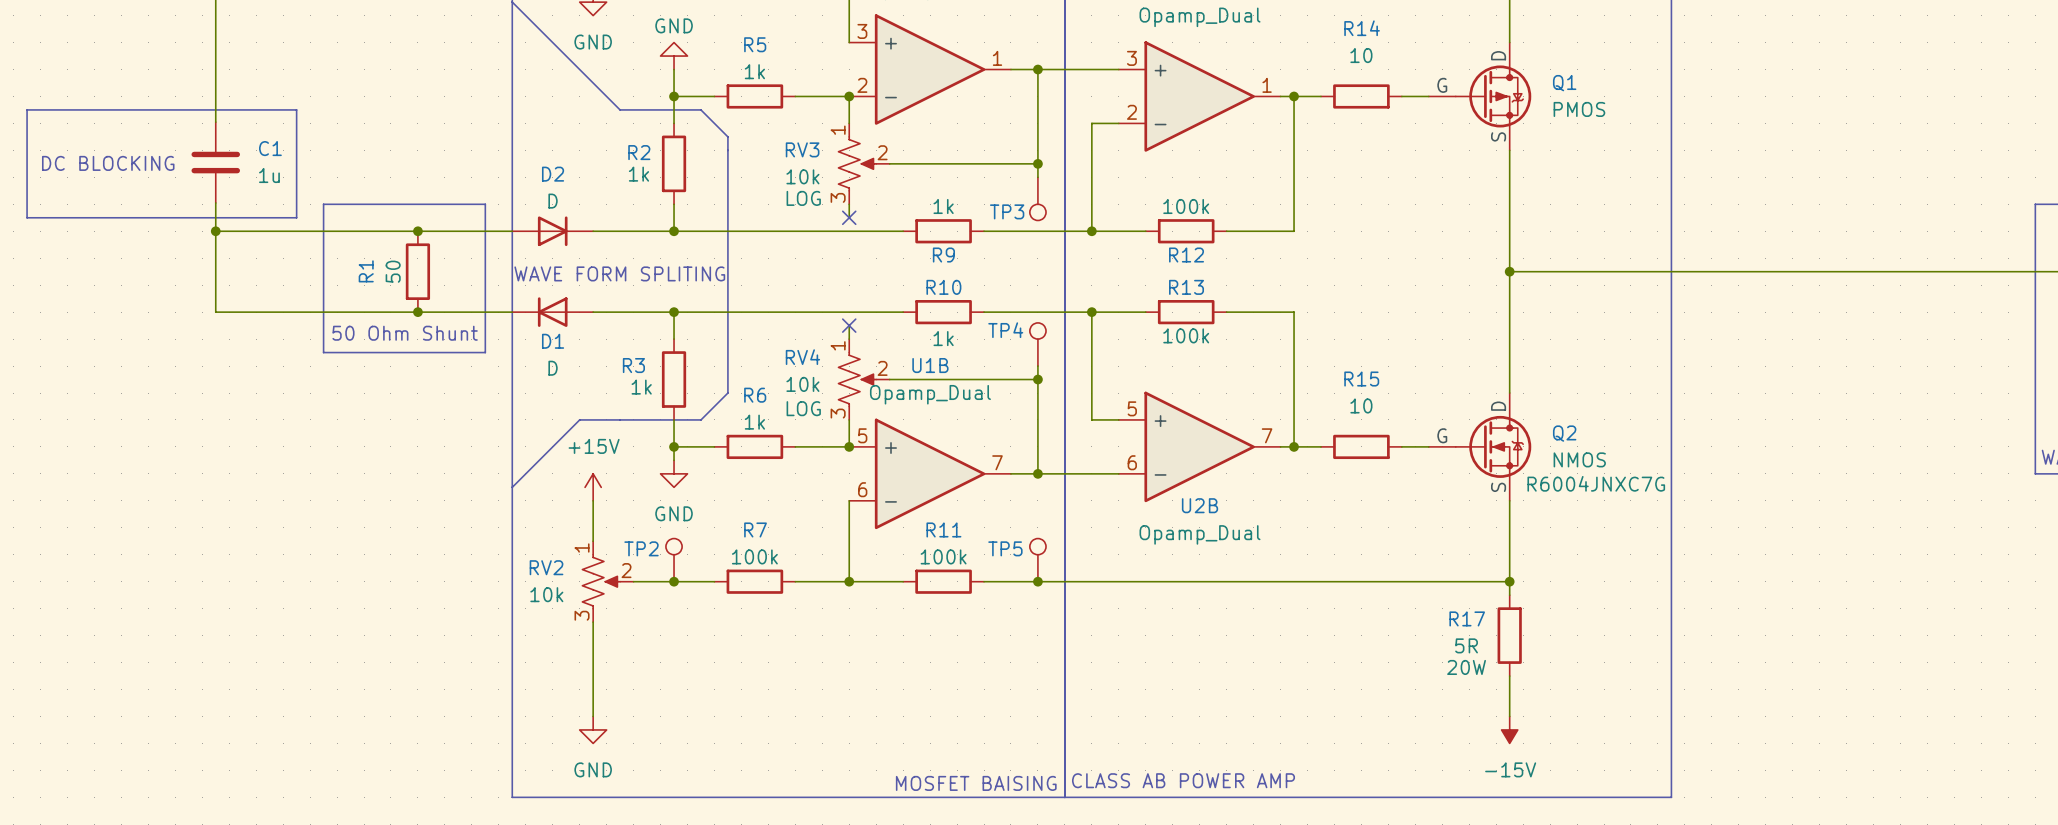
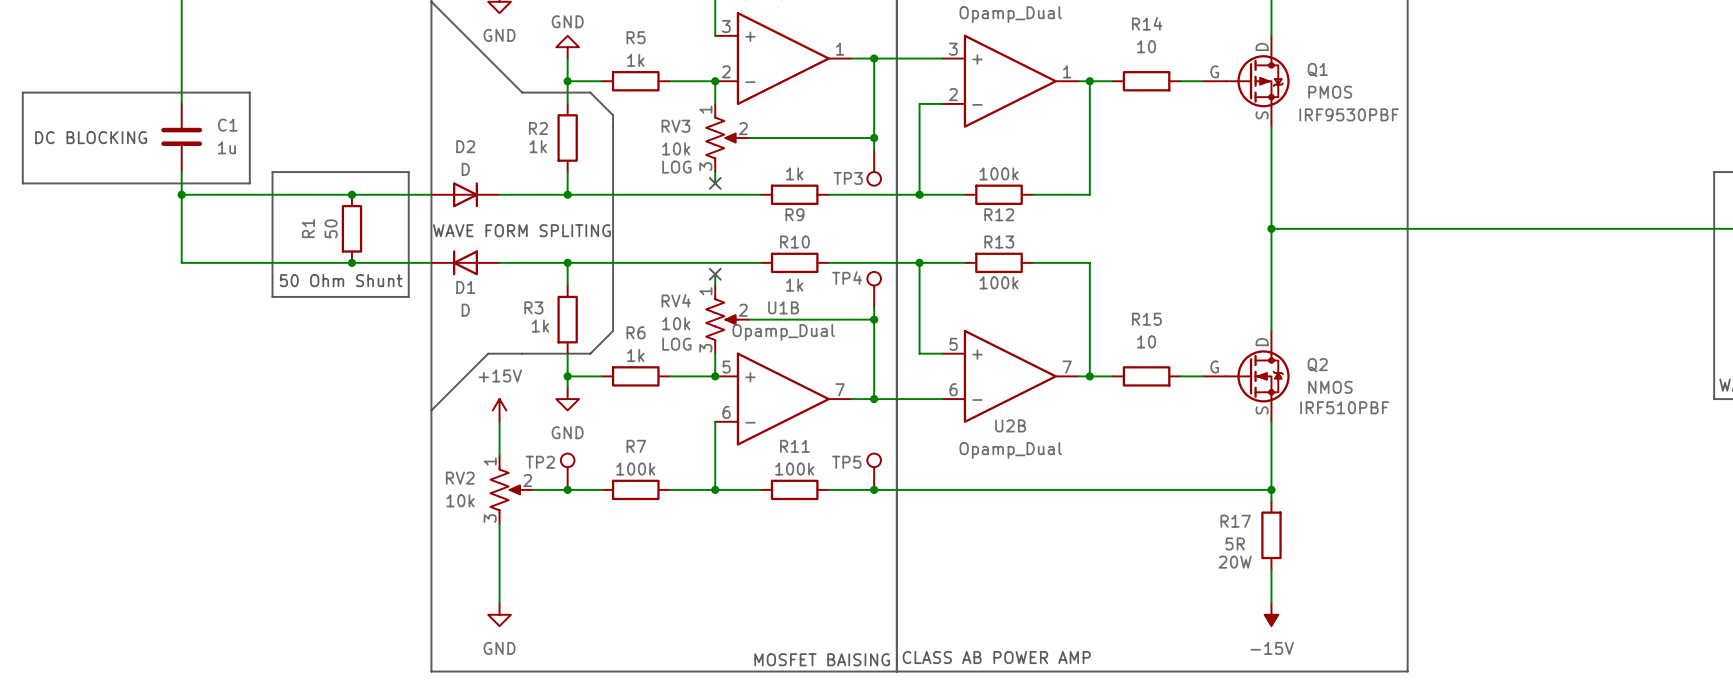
Q1 text: none -> IRF9530PBF (1349, 114)
Q2 text: R6004JNXC7G (1596, 483) -> IRF510PBF (1344, 407)

